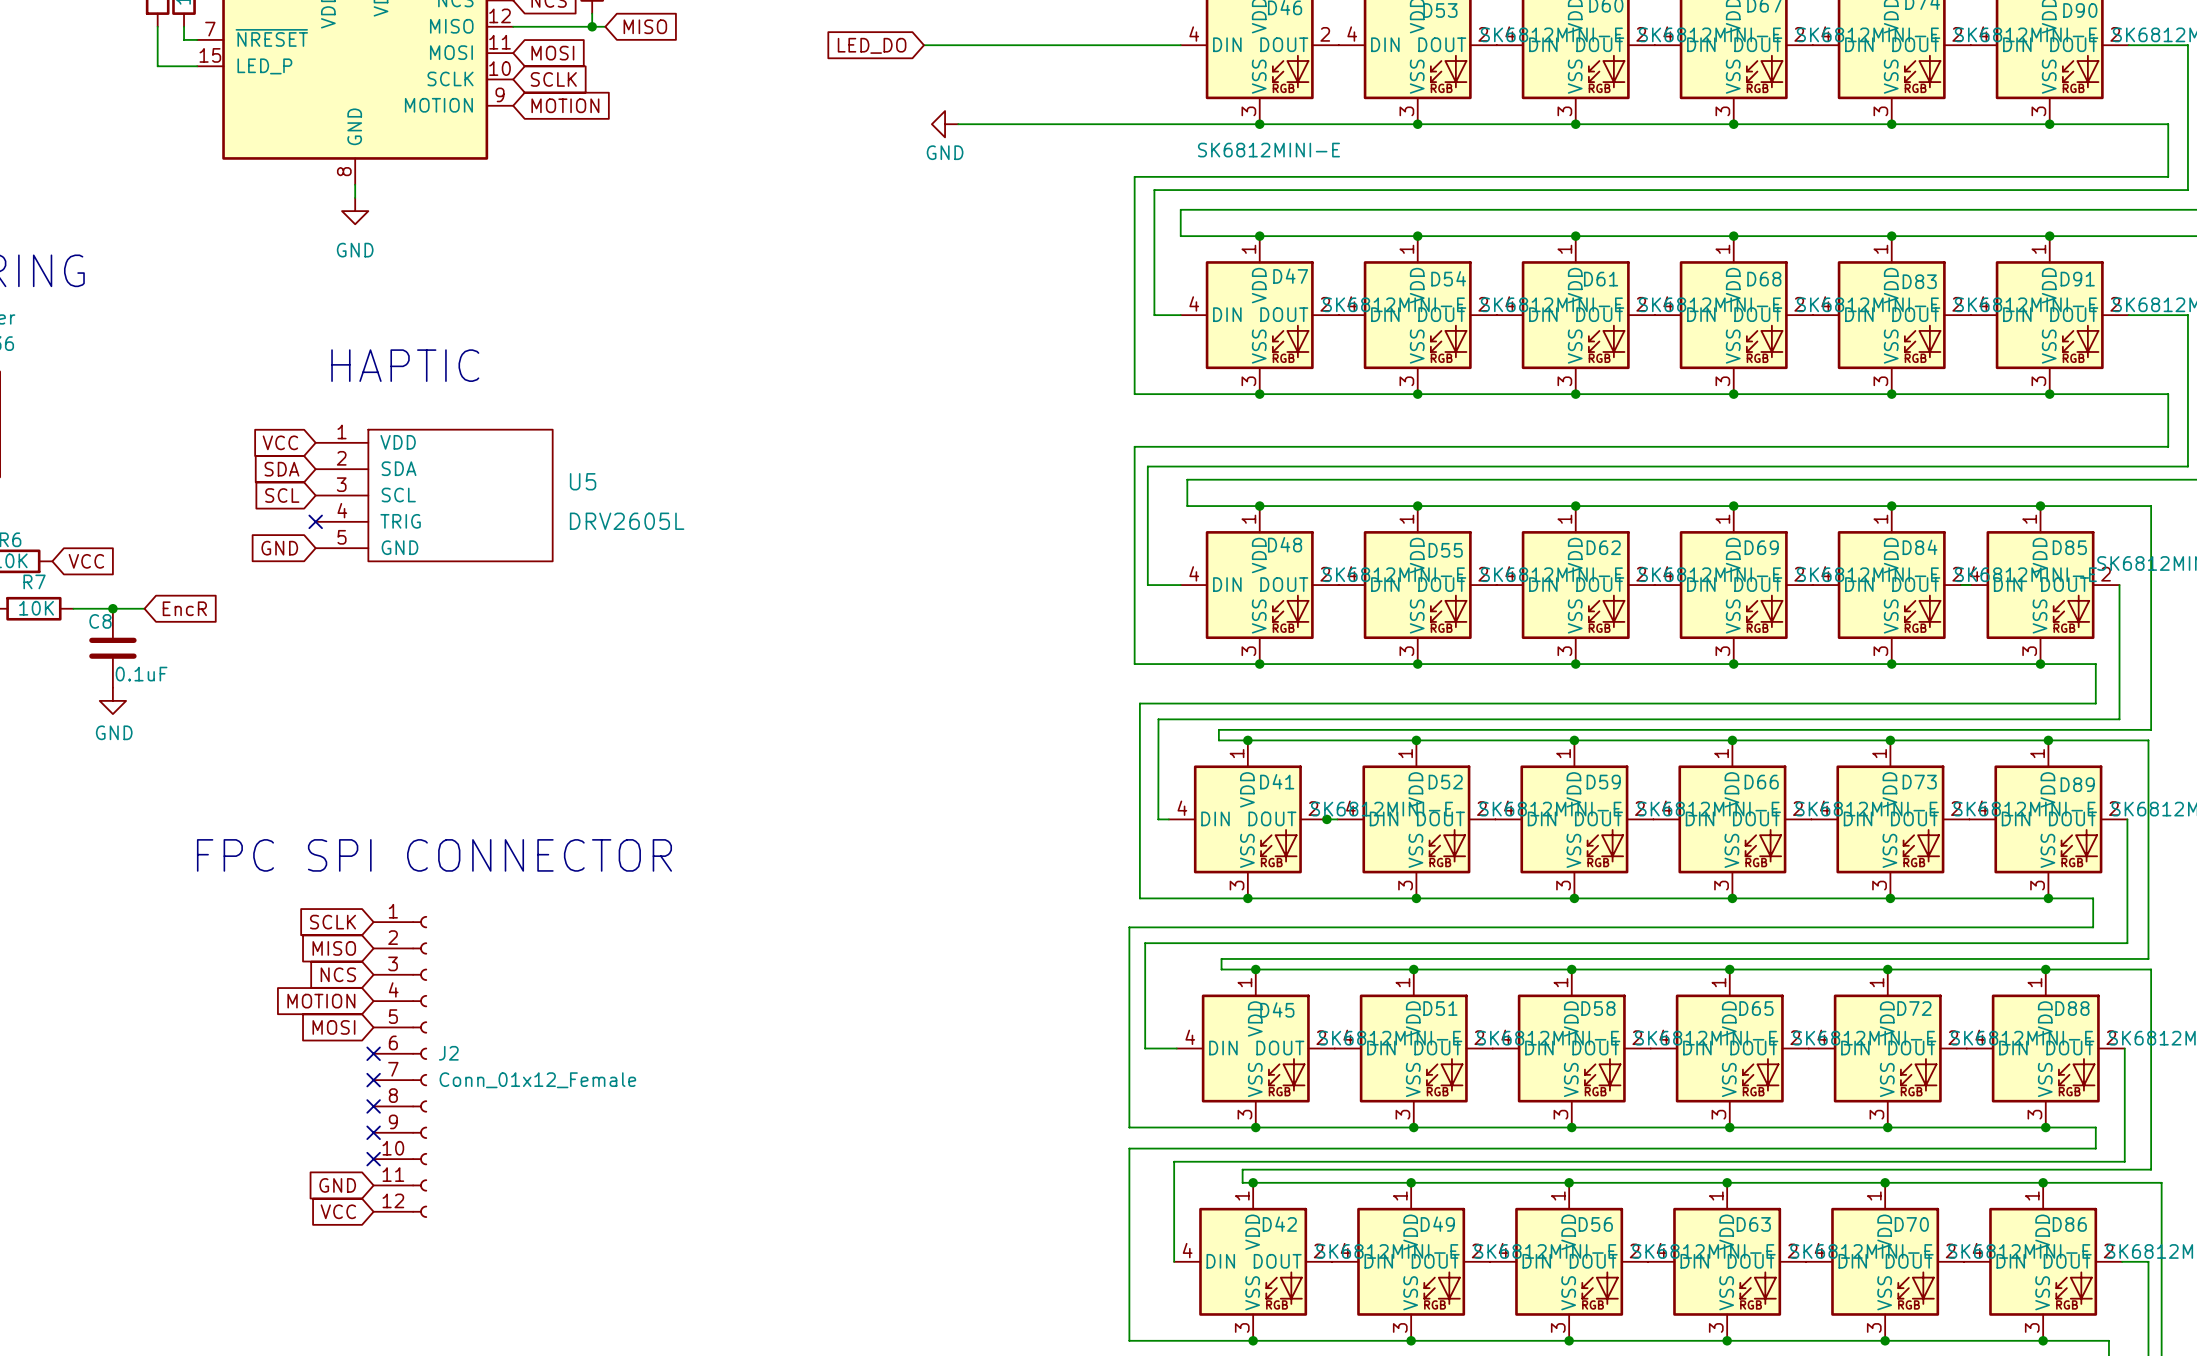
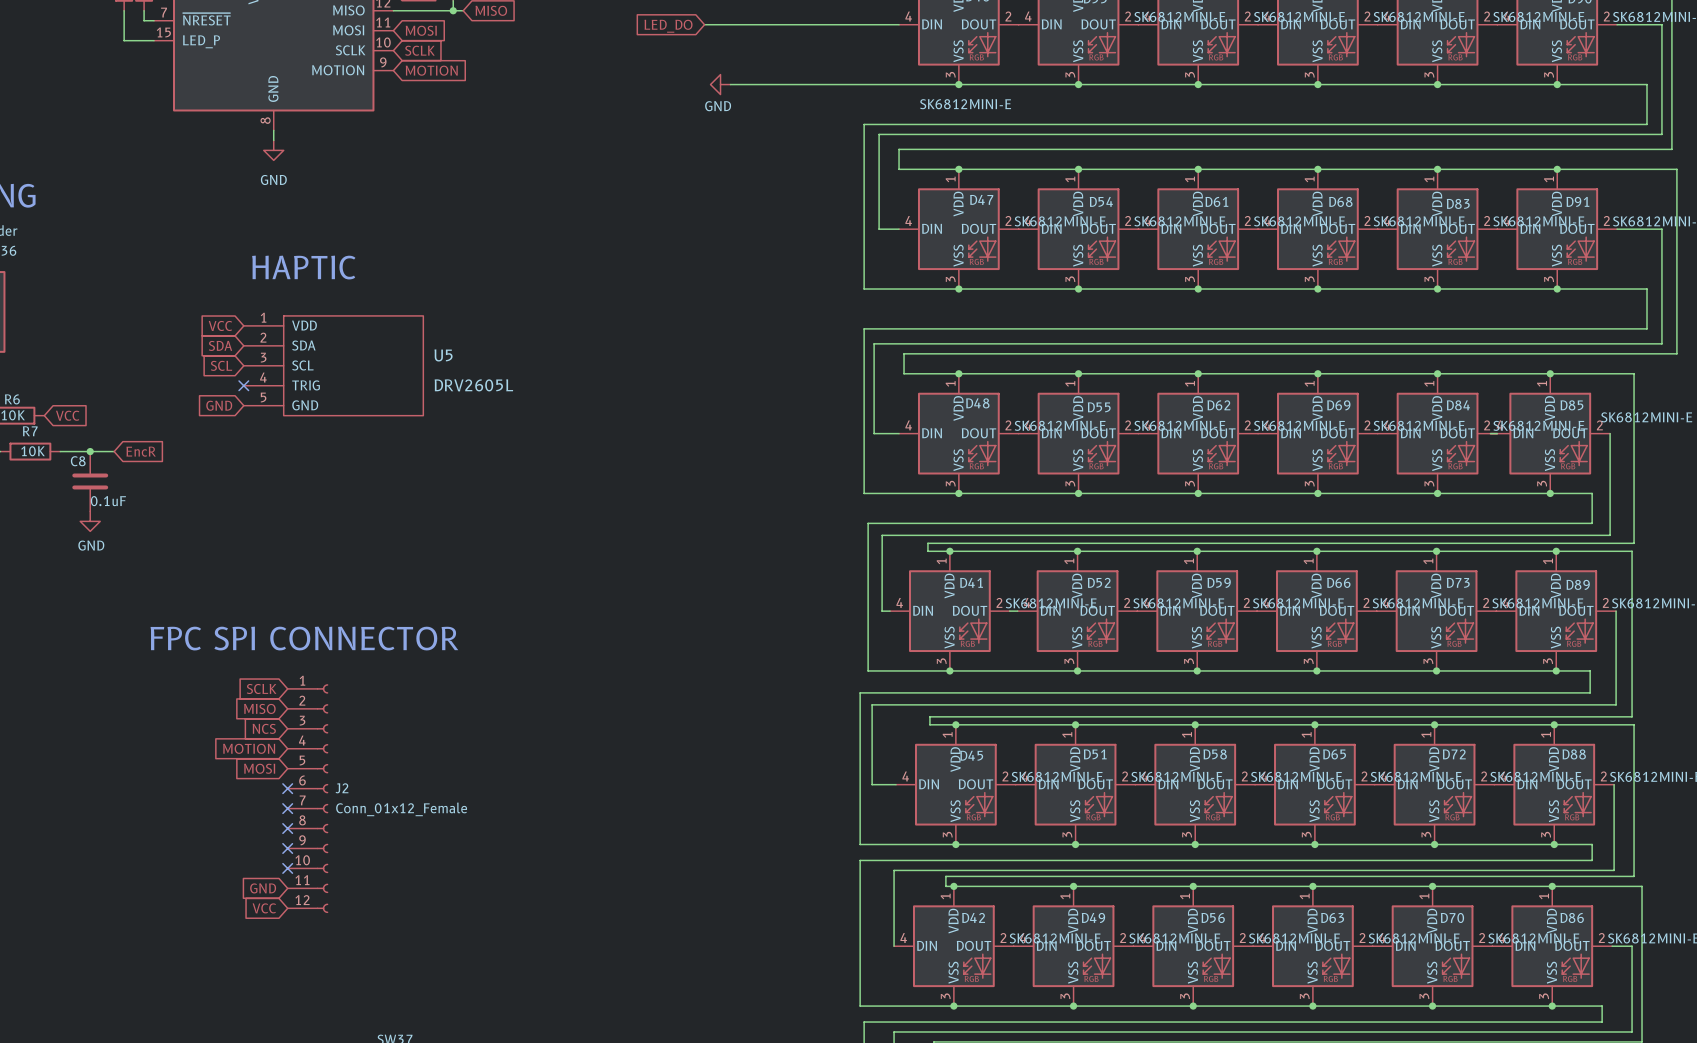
junction: (1326, 819) -> none

